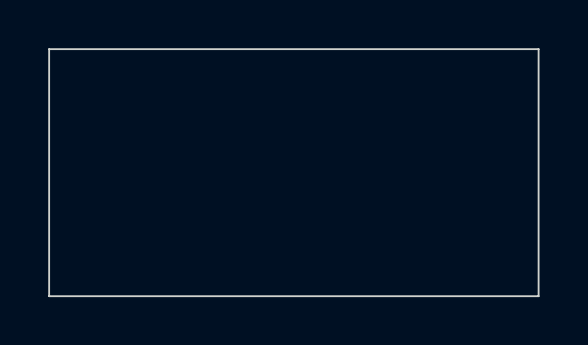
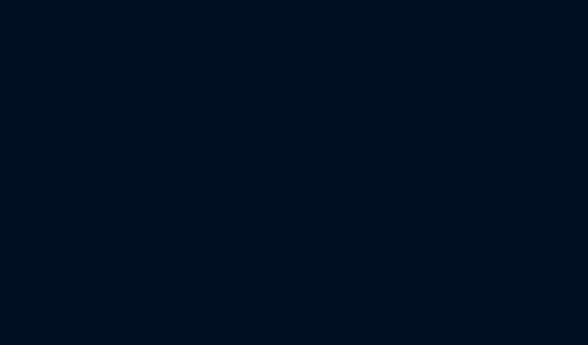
board edge: (538, 49) (538, 296) (49, 296) (49, 49) (538, 49) -> none

